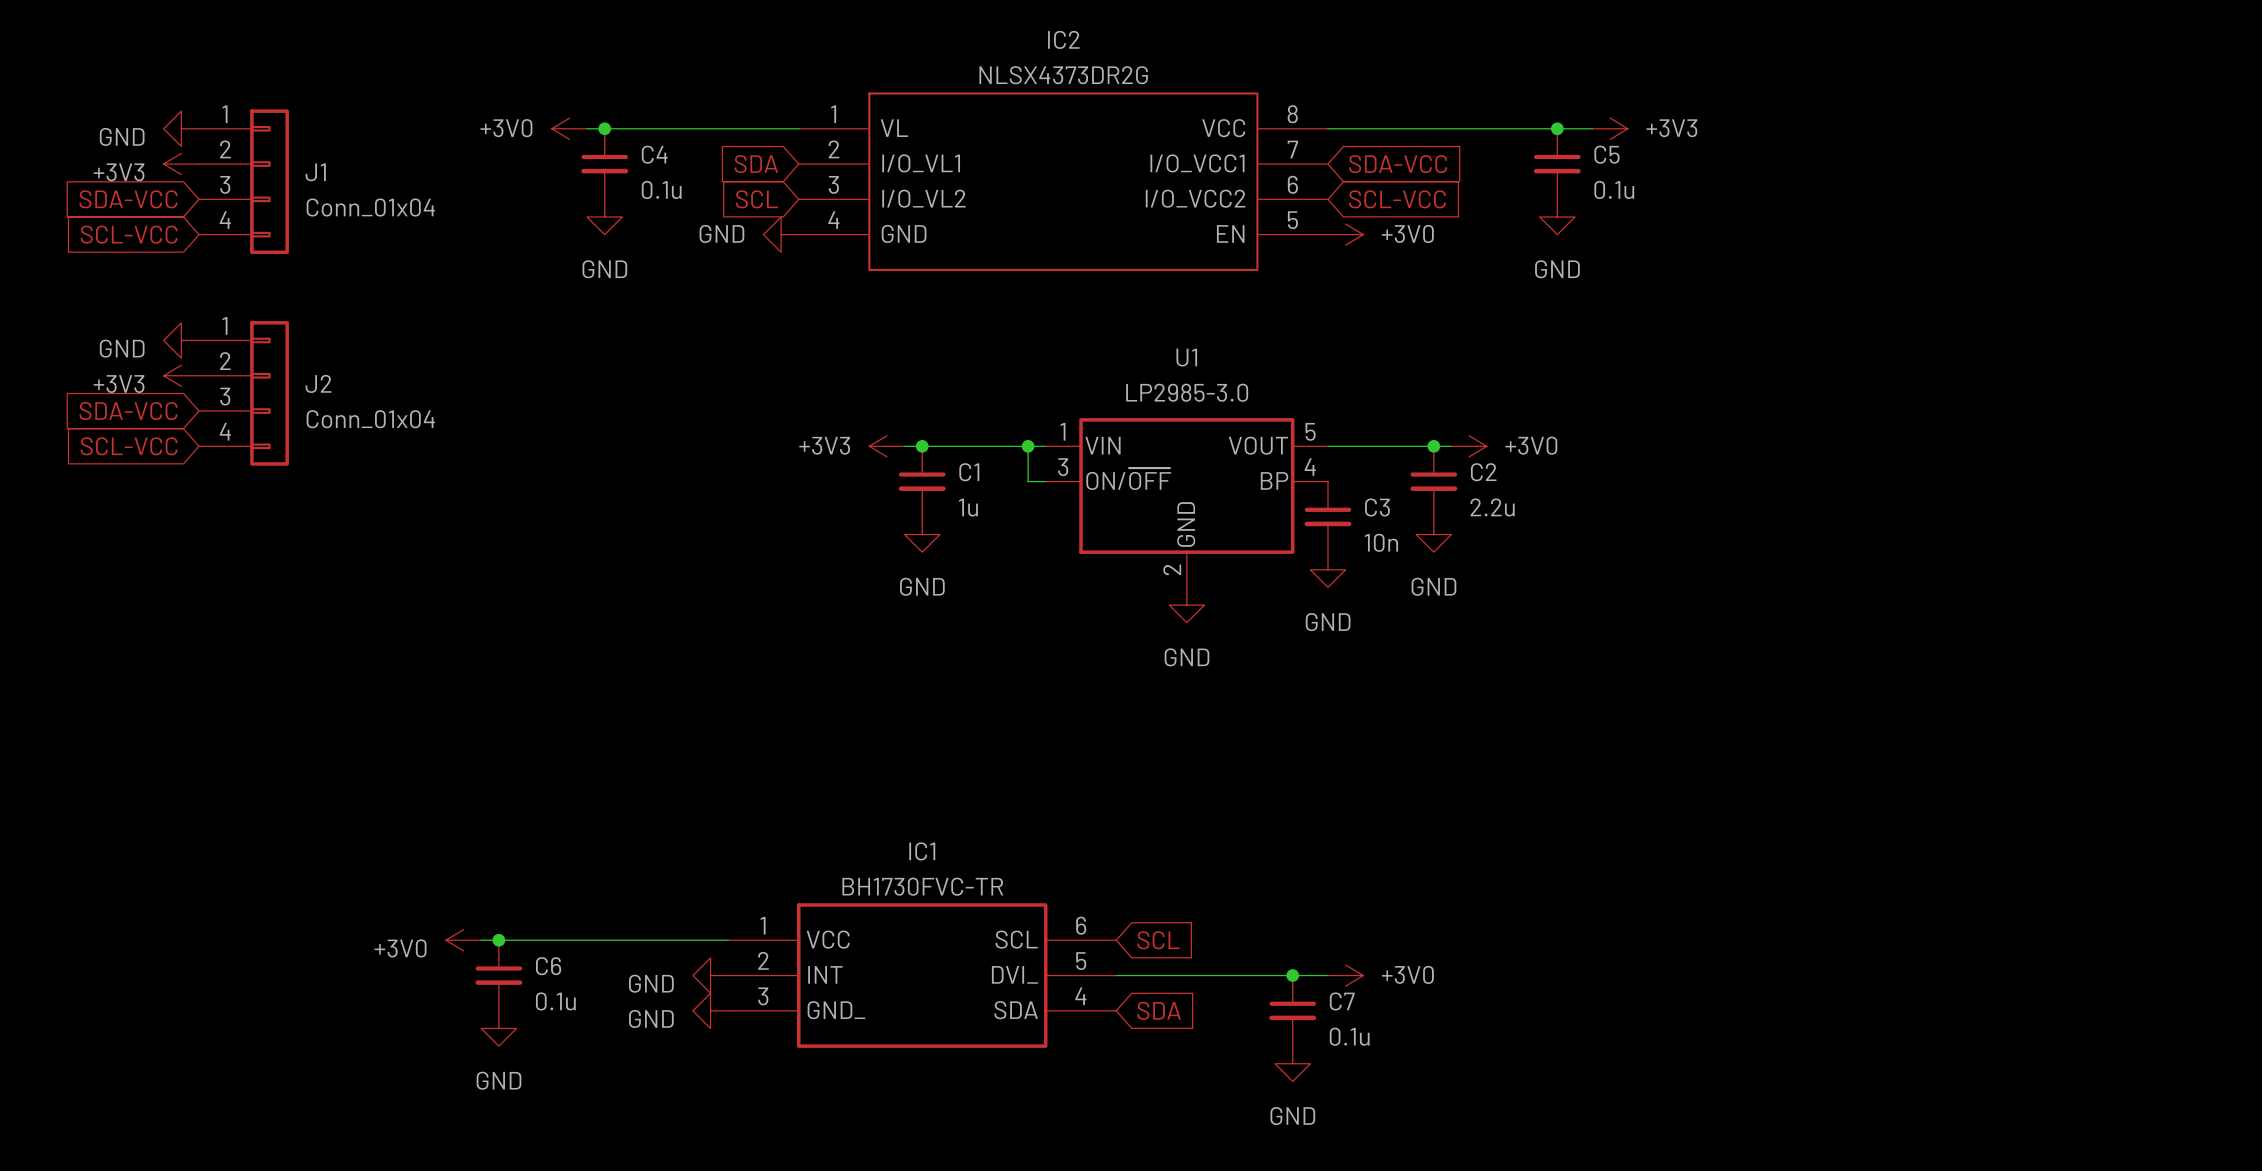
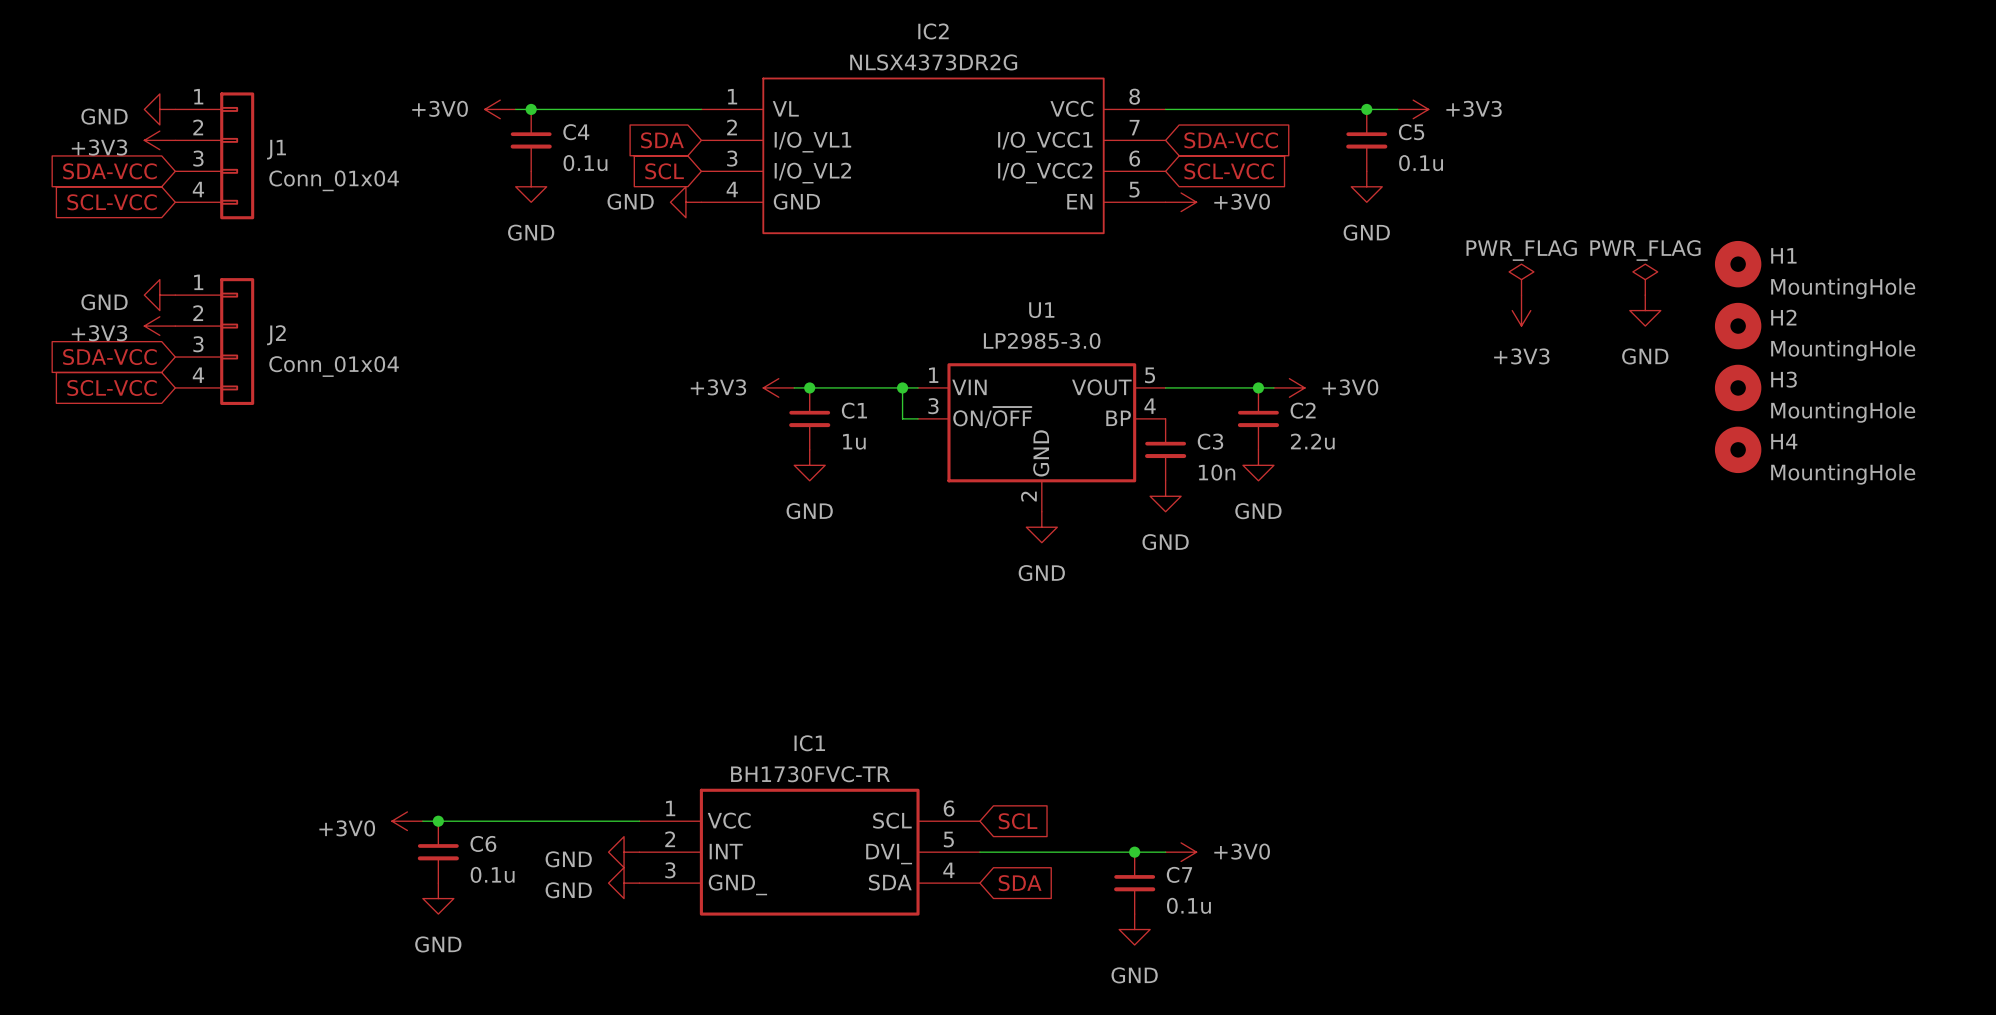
H1: none -> MountingHole (1738, 264)
power symbol: none -> PWR_FLAG (1521, 279)
power symbol: none -> PWR_FLAG (1645, 279)
power symbol: none -> +3V3 (1521, 310)
power symbol: none -> GND (1645, 310)
H2: none -> MountingHole (1738, 326)
H3: none -> MountingHole (1738, 387)
H4: none -> MountingHole (1738, 449)

